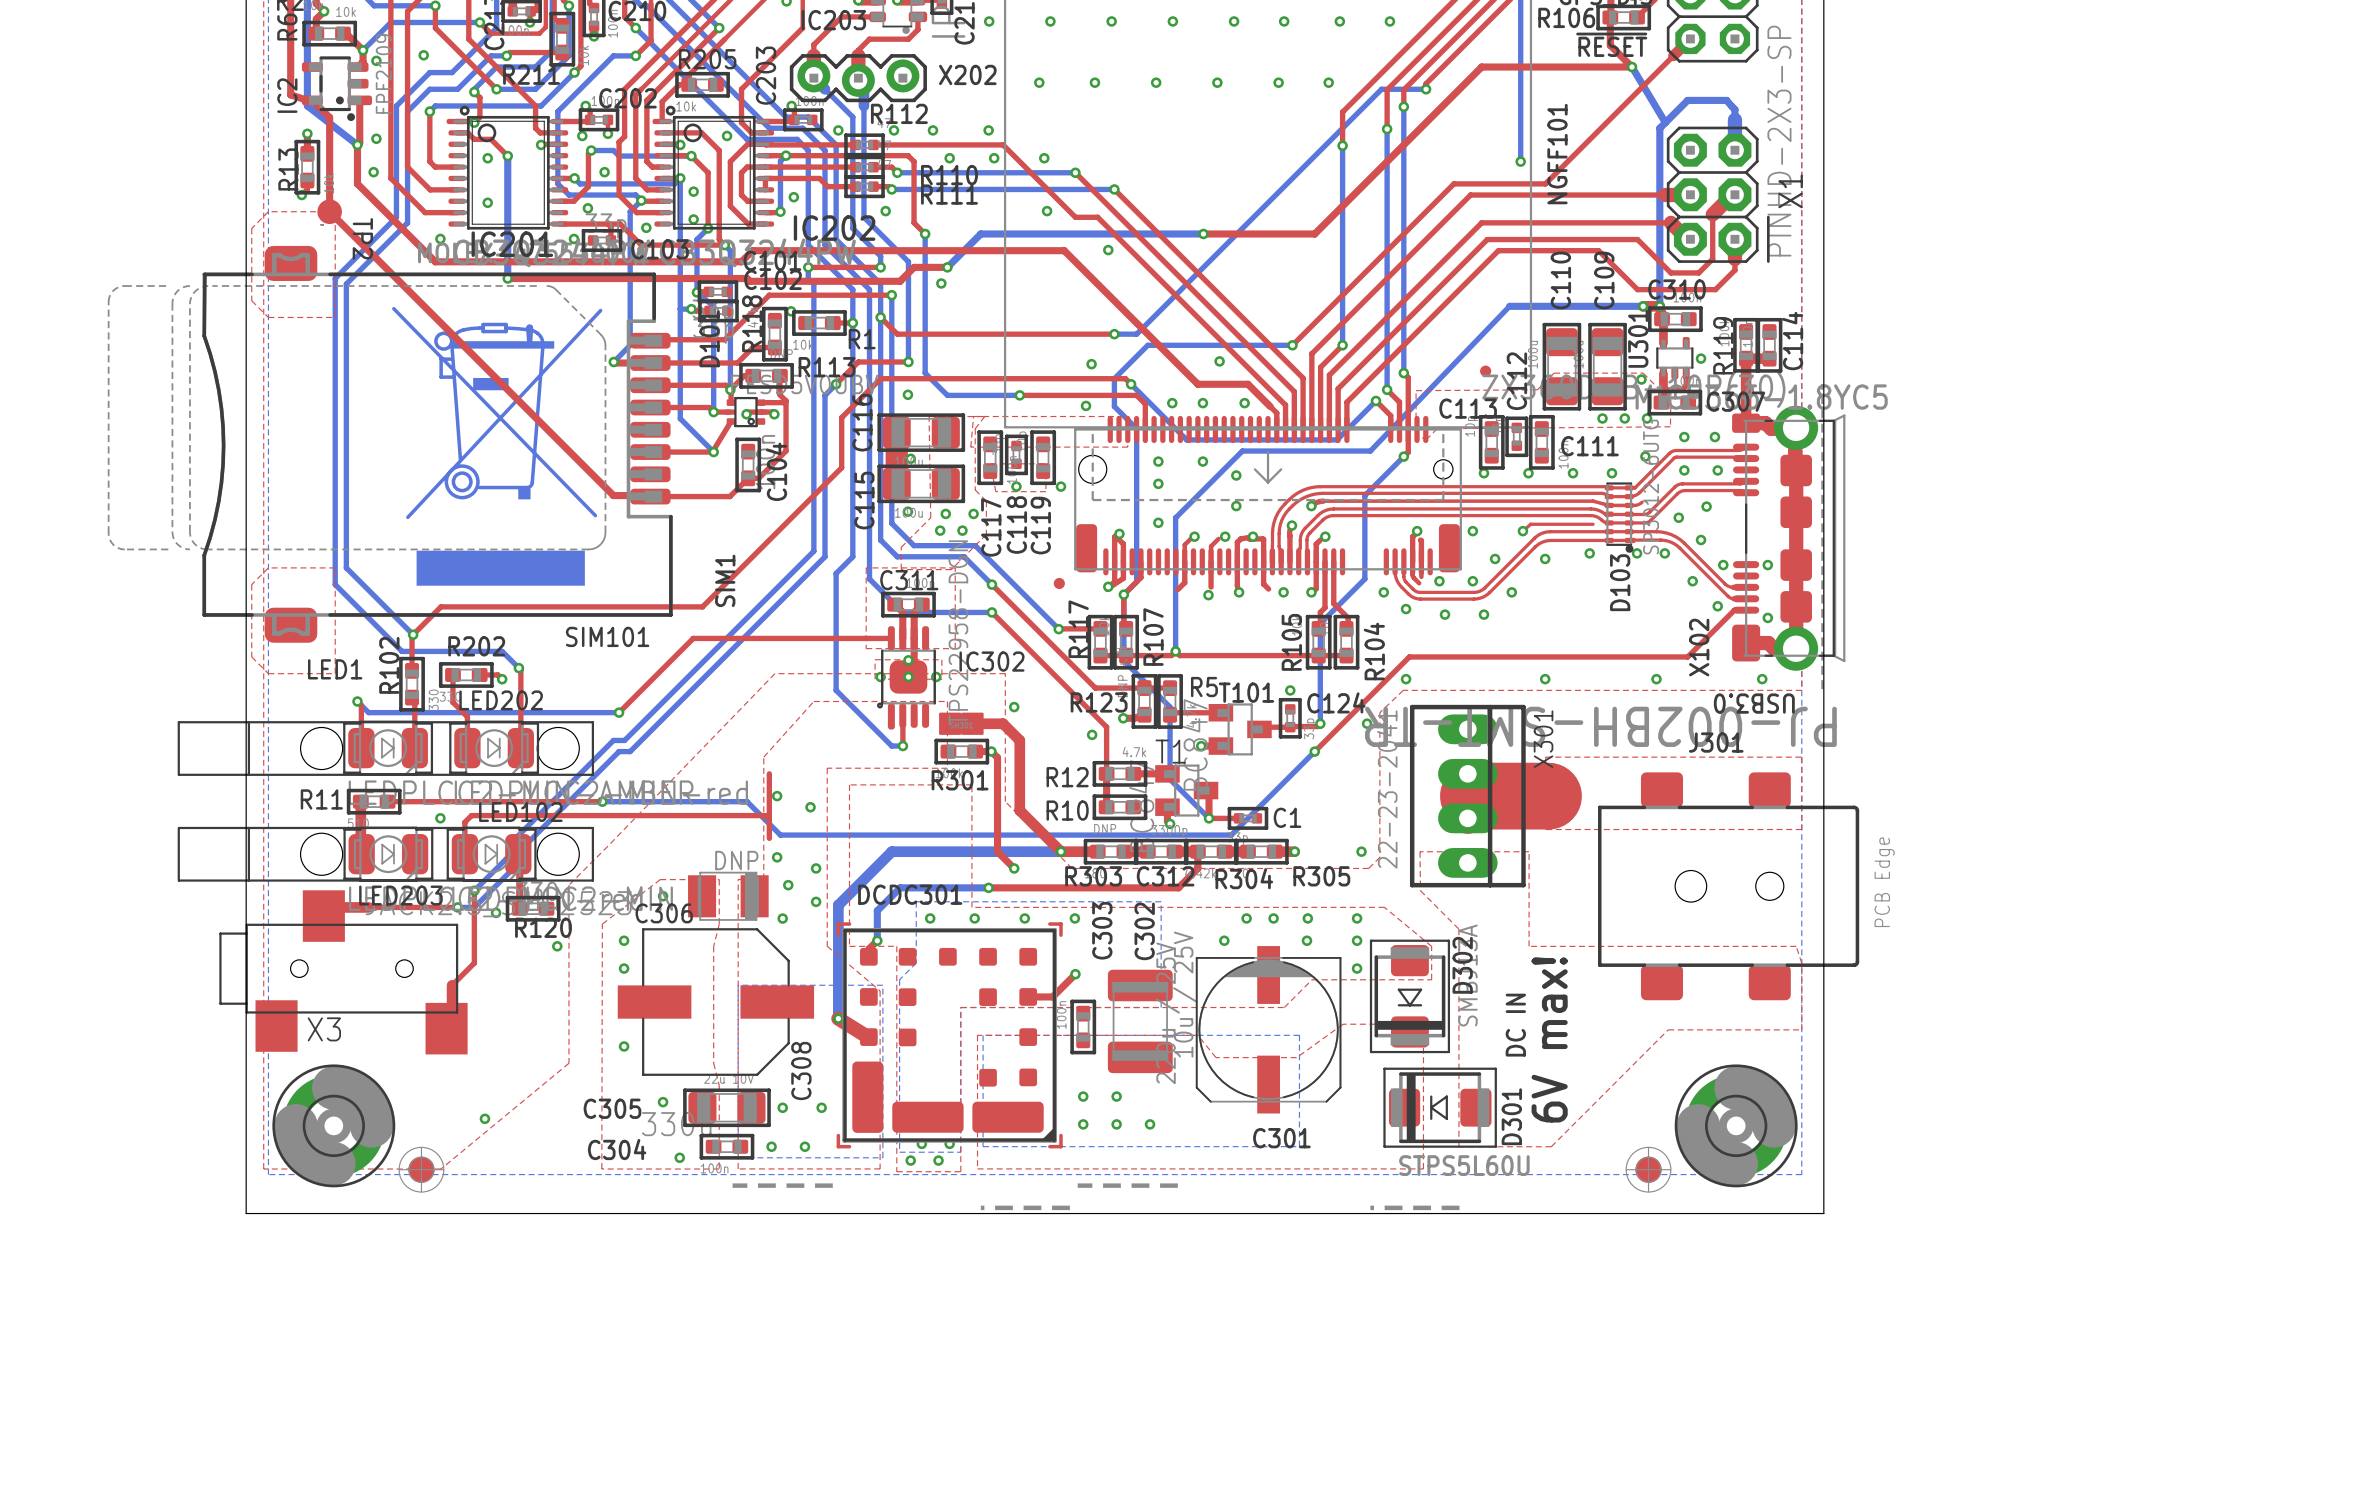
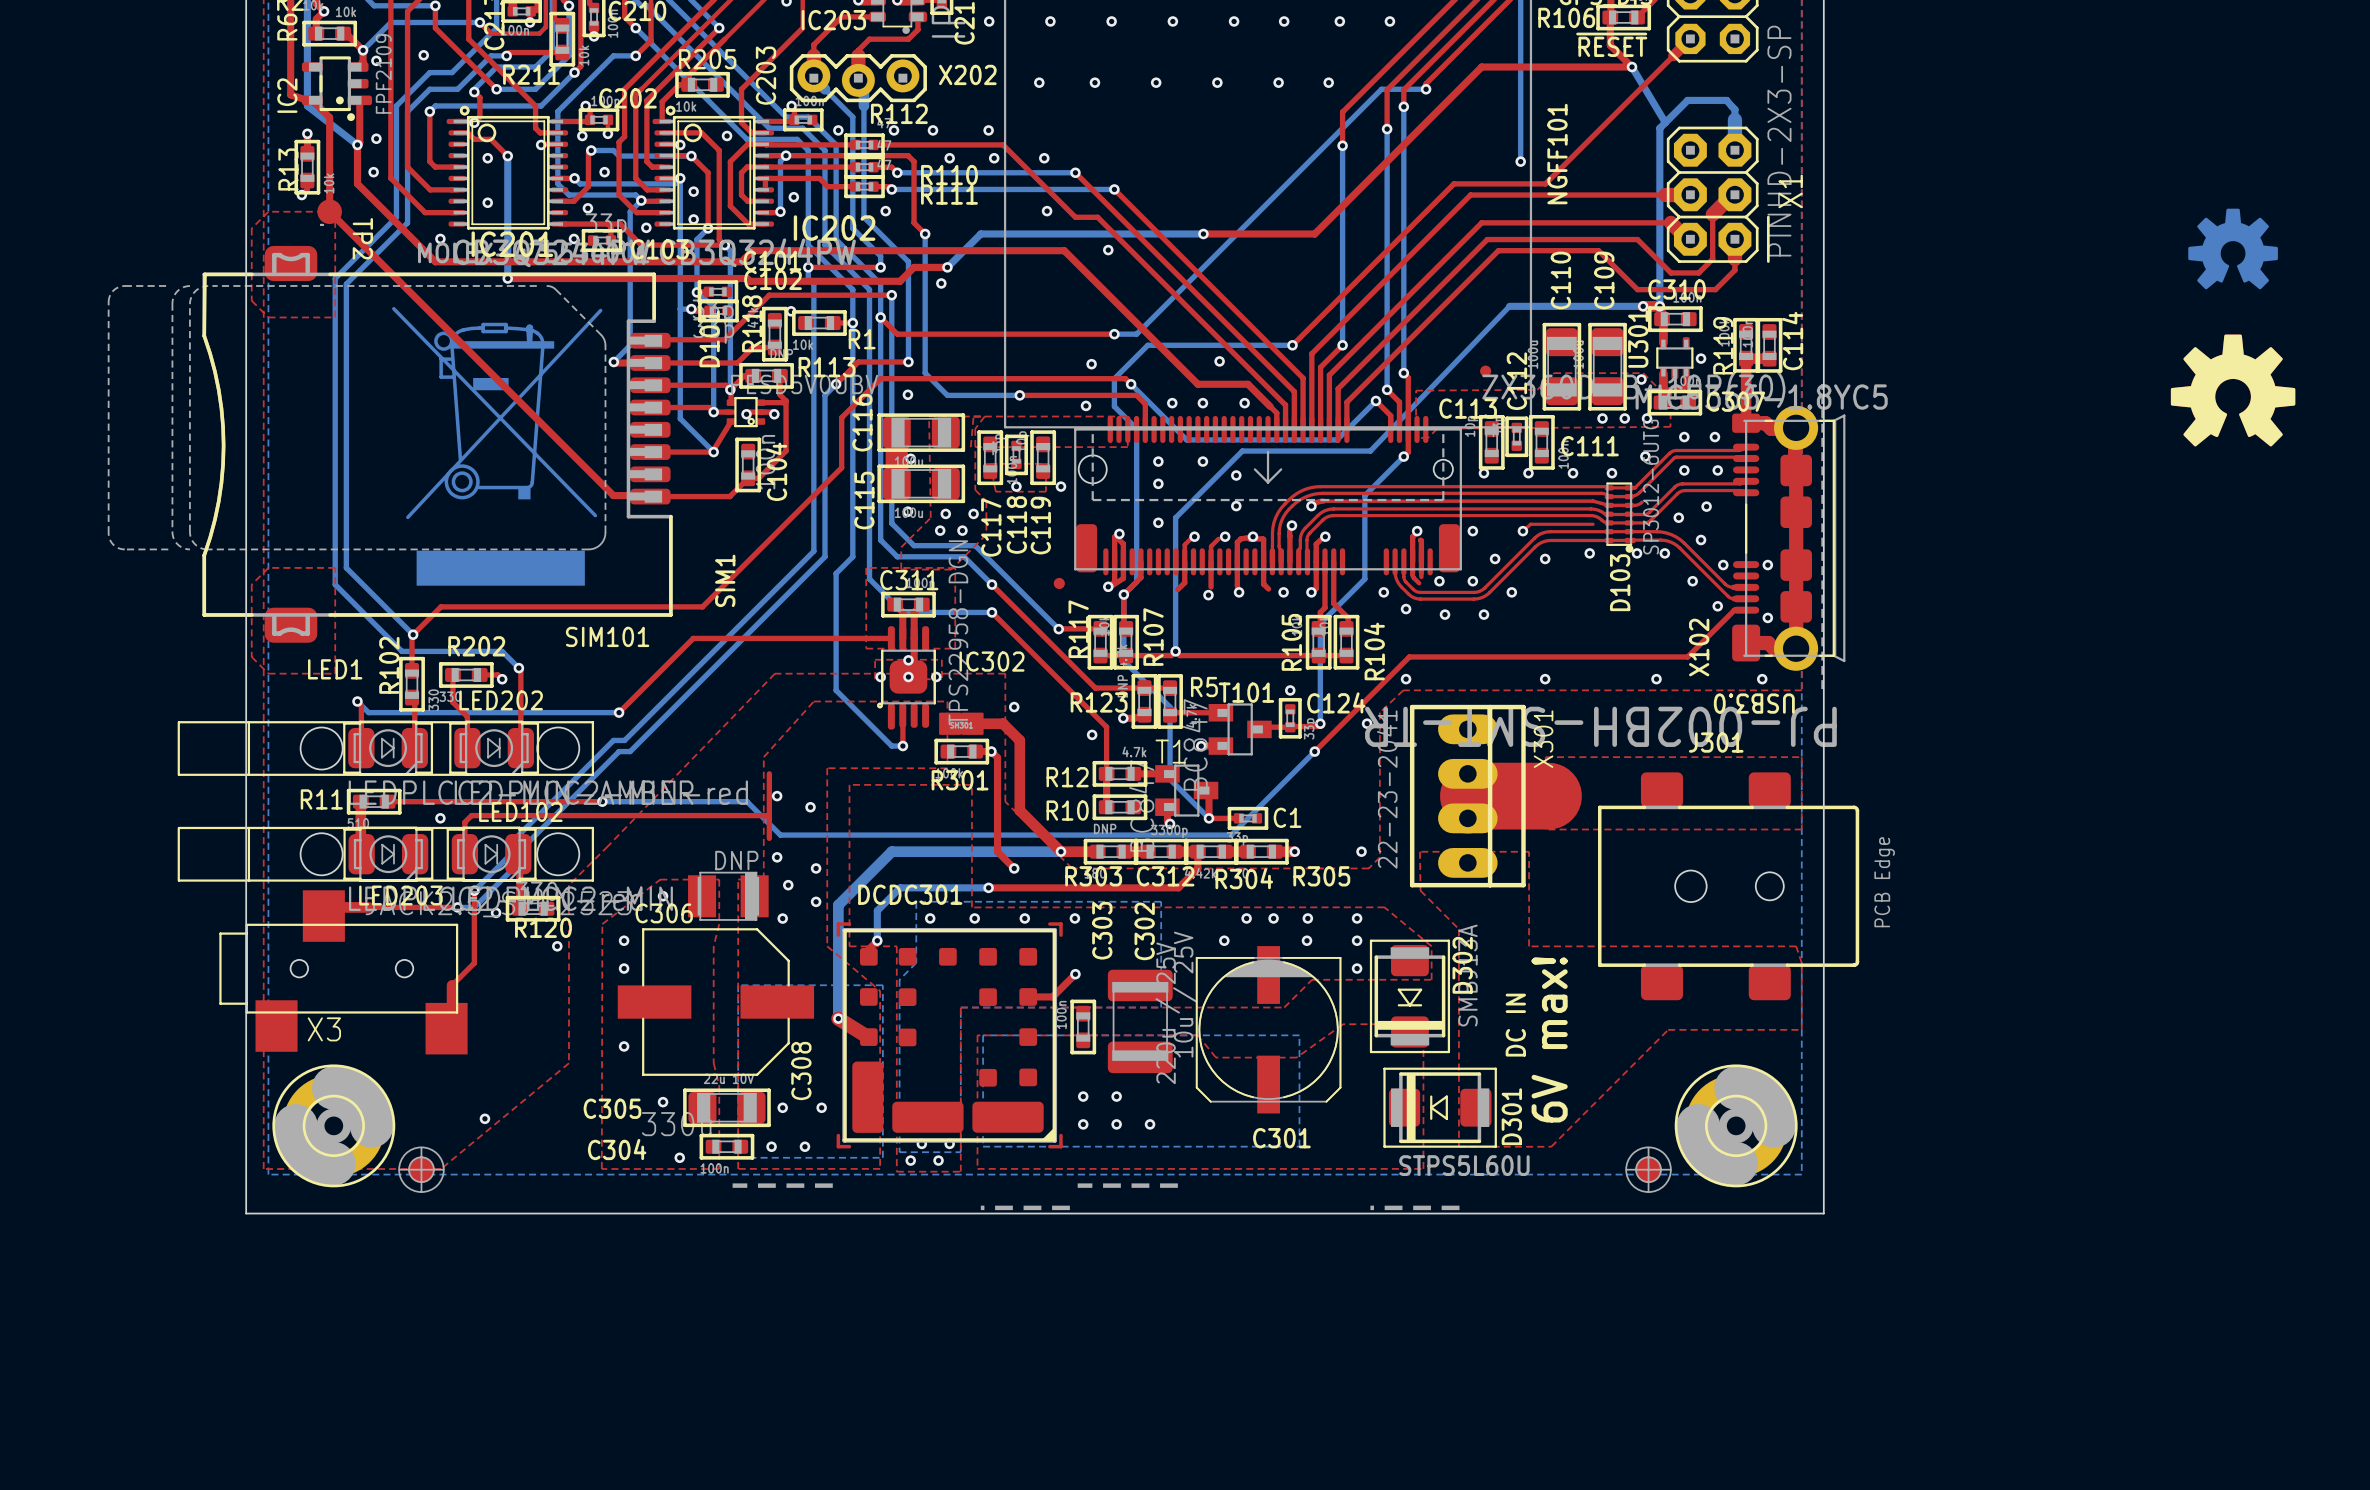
drawing: none -> [2188, 208, 2278, 290]
drawing: none -> [2170, 334, 2296, 447]

